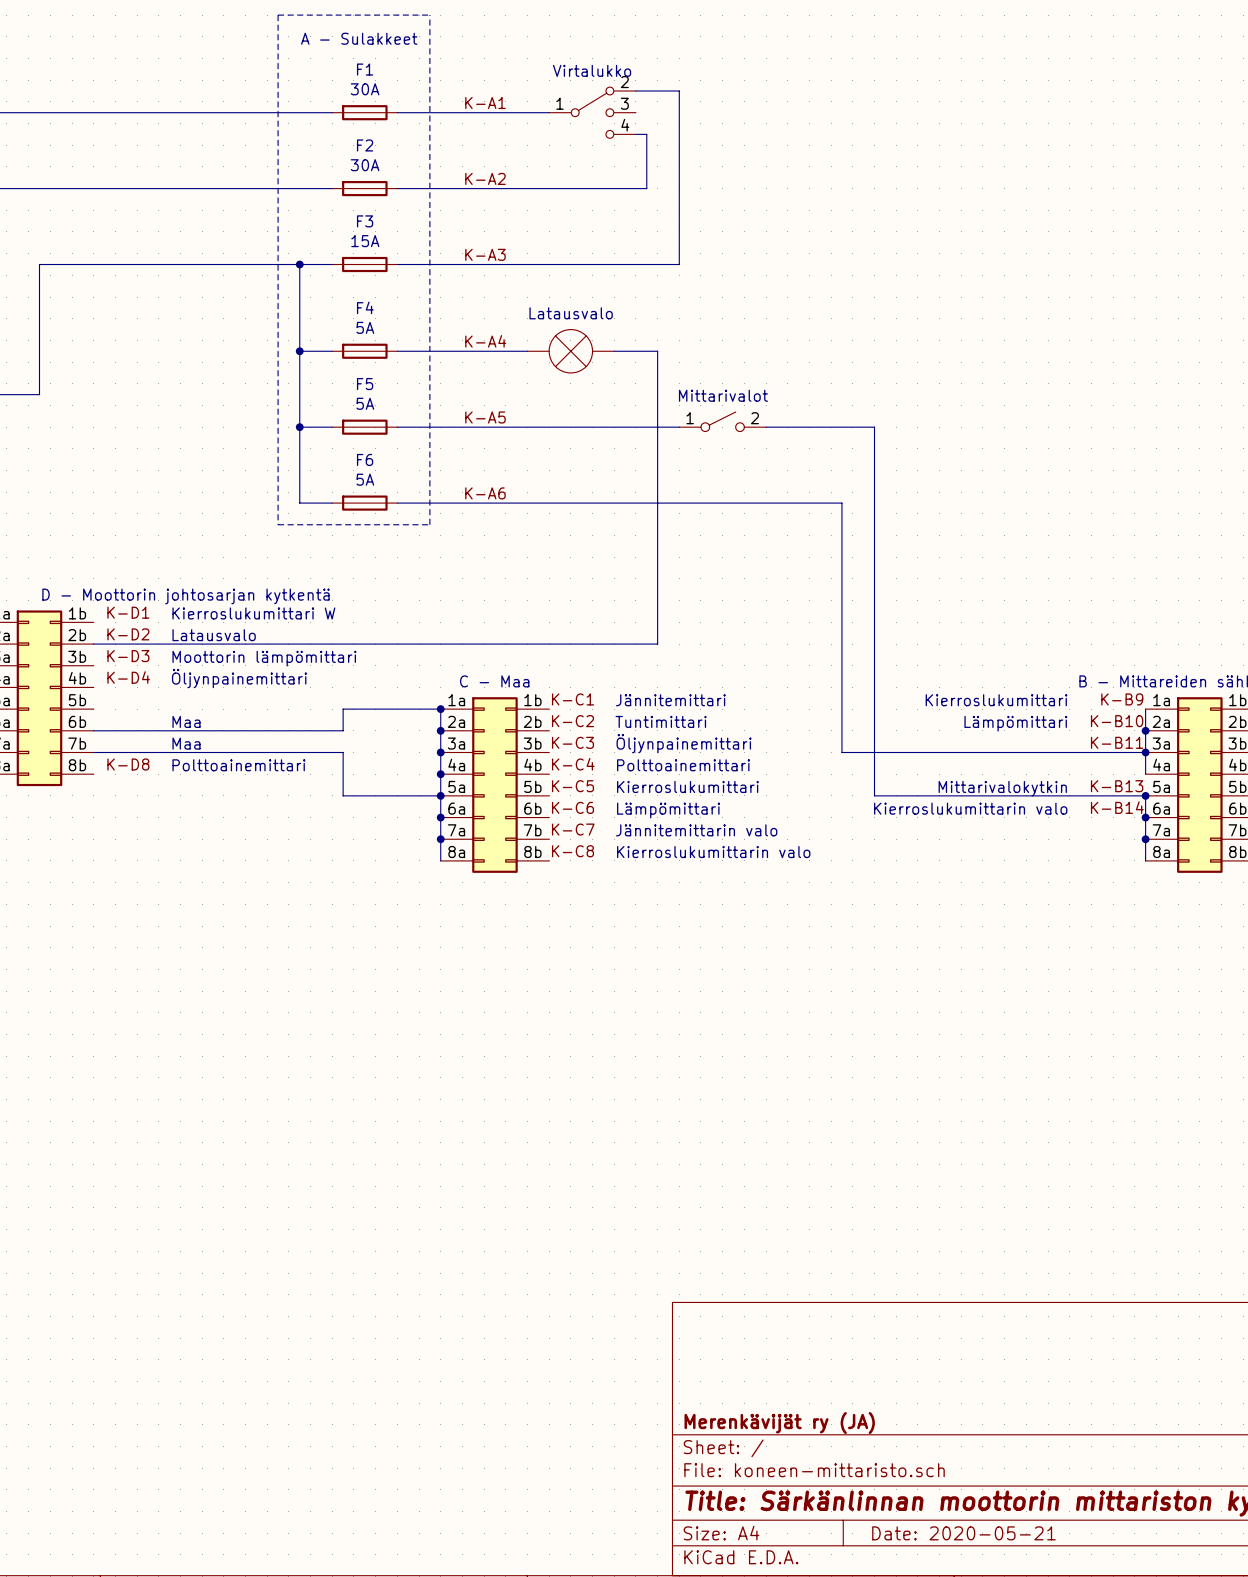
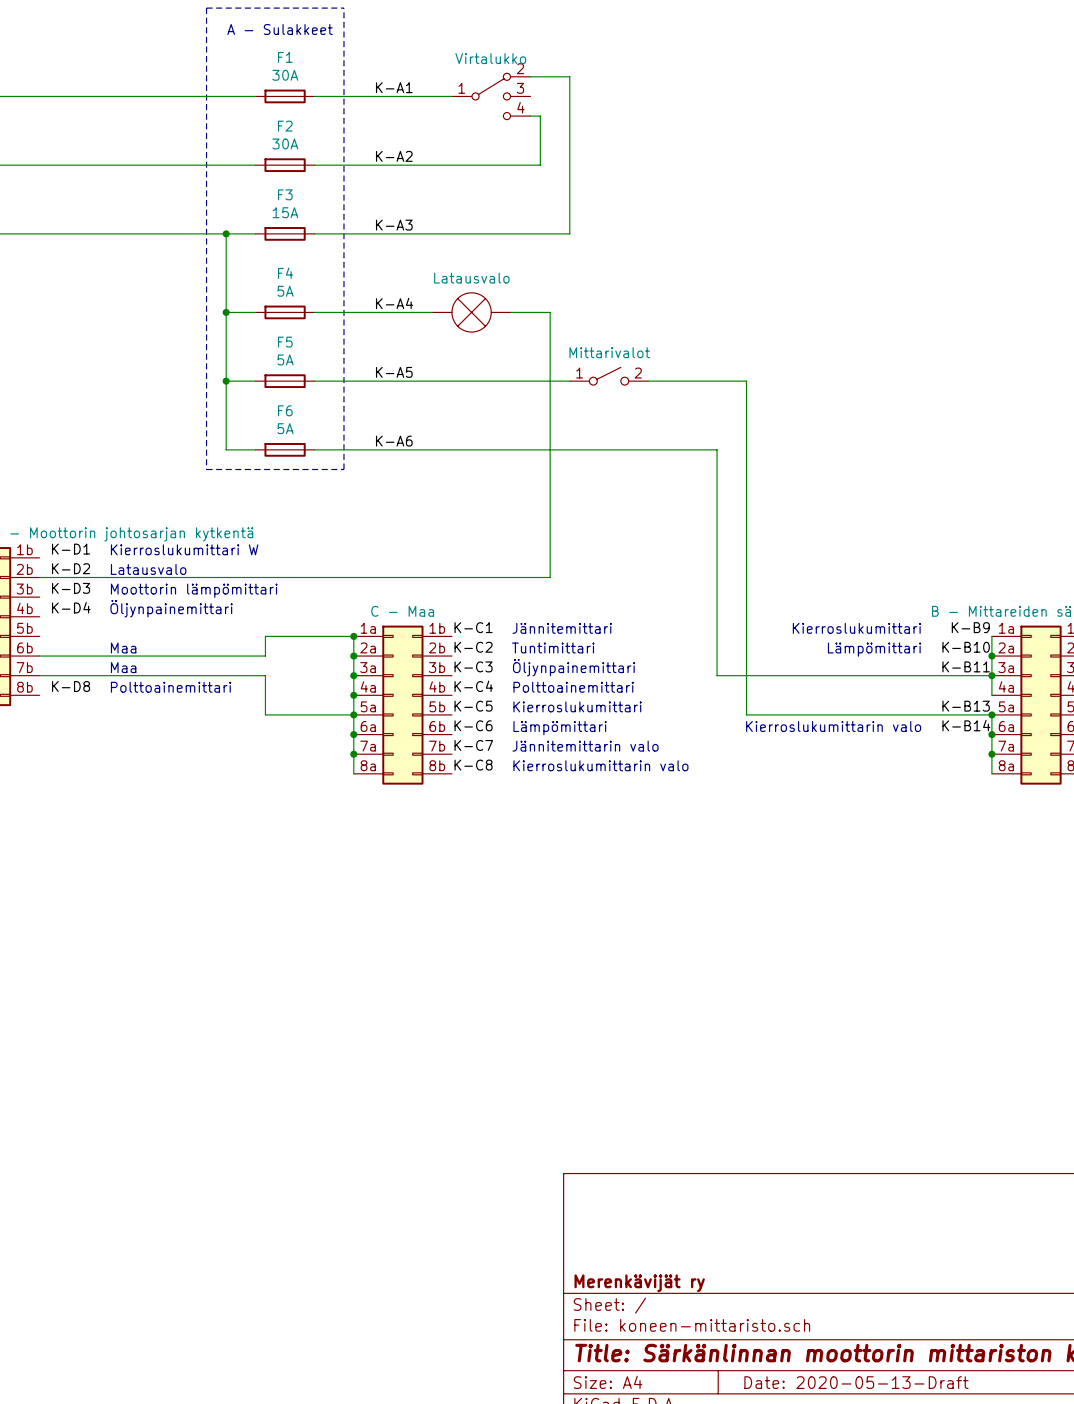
text: Mittarivalokytkin (1002, 788) -> none
title block: Merenkävijät ry (JA) (779, 1423) -> Merenkävijät ry (639, 1283)
title block: Date: 2020-05-21 (963, 1533) -> Date: 2020-05-13-Draft (856, 1382)

